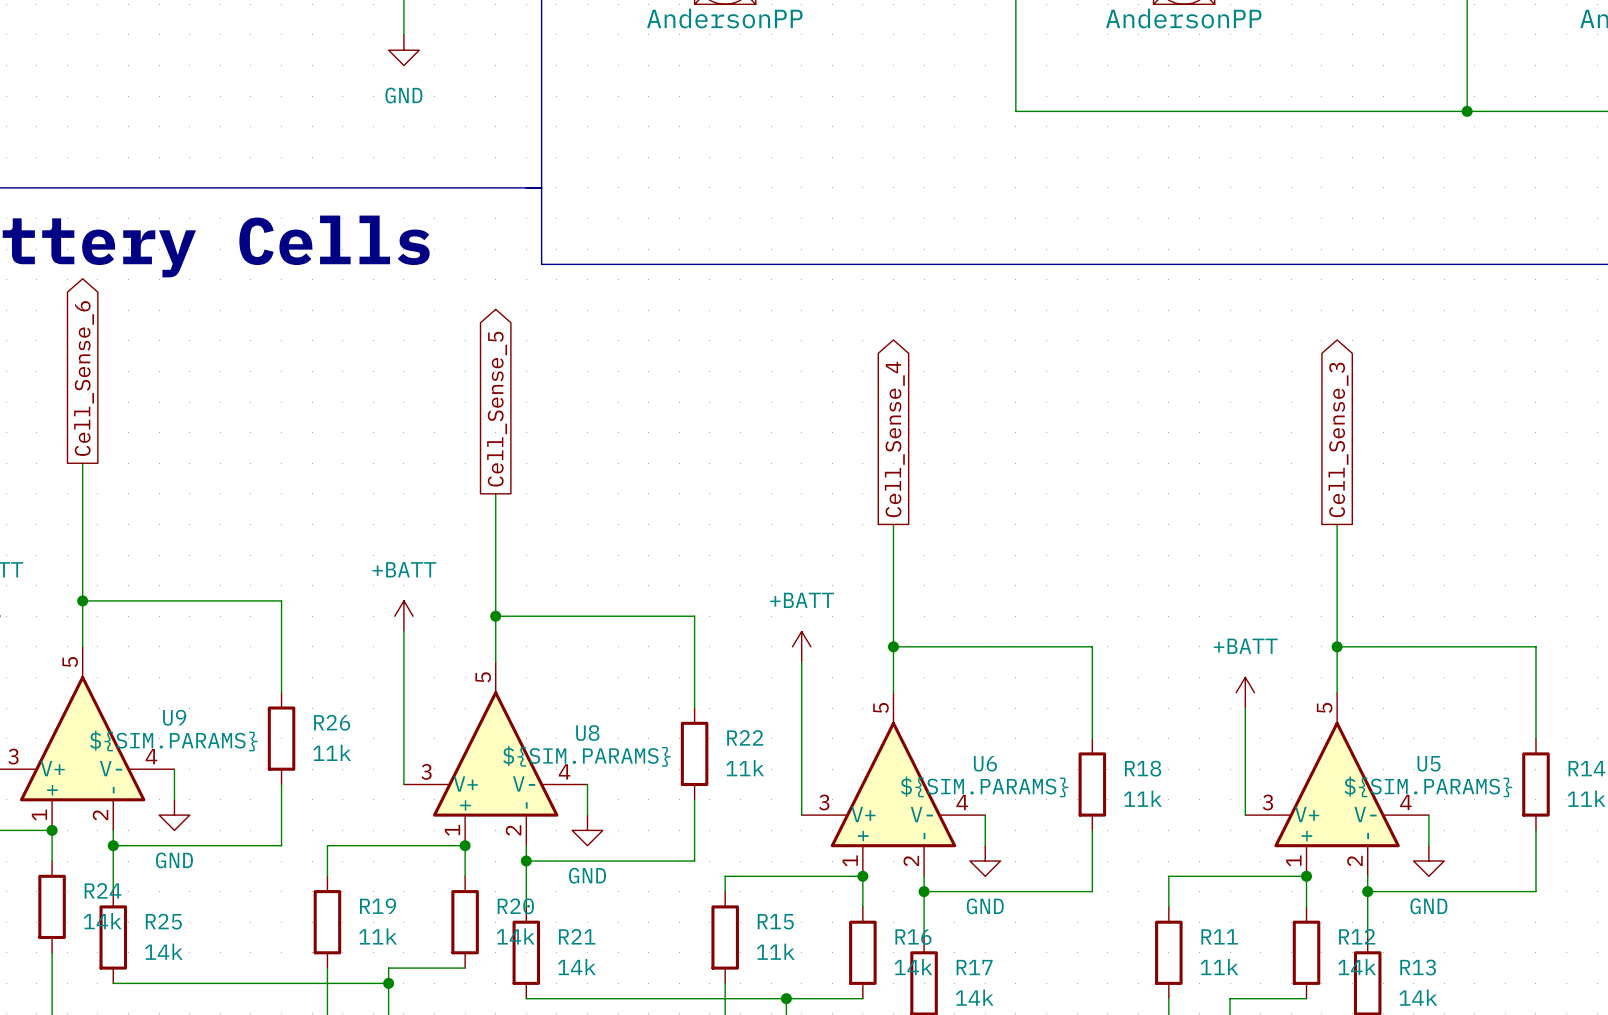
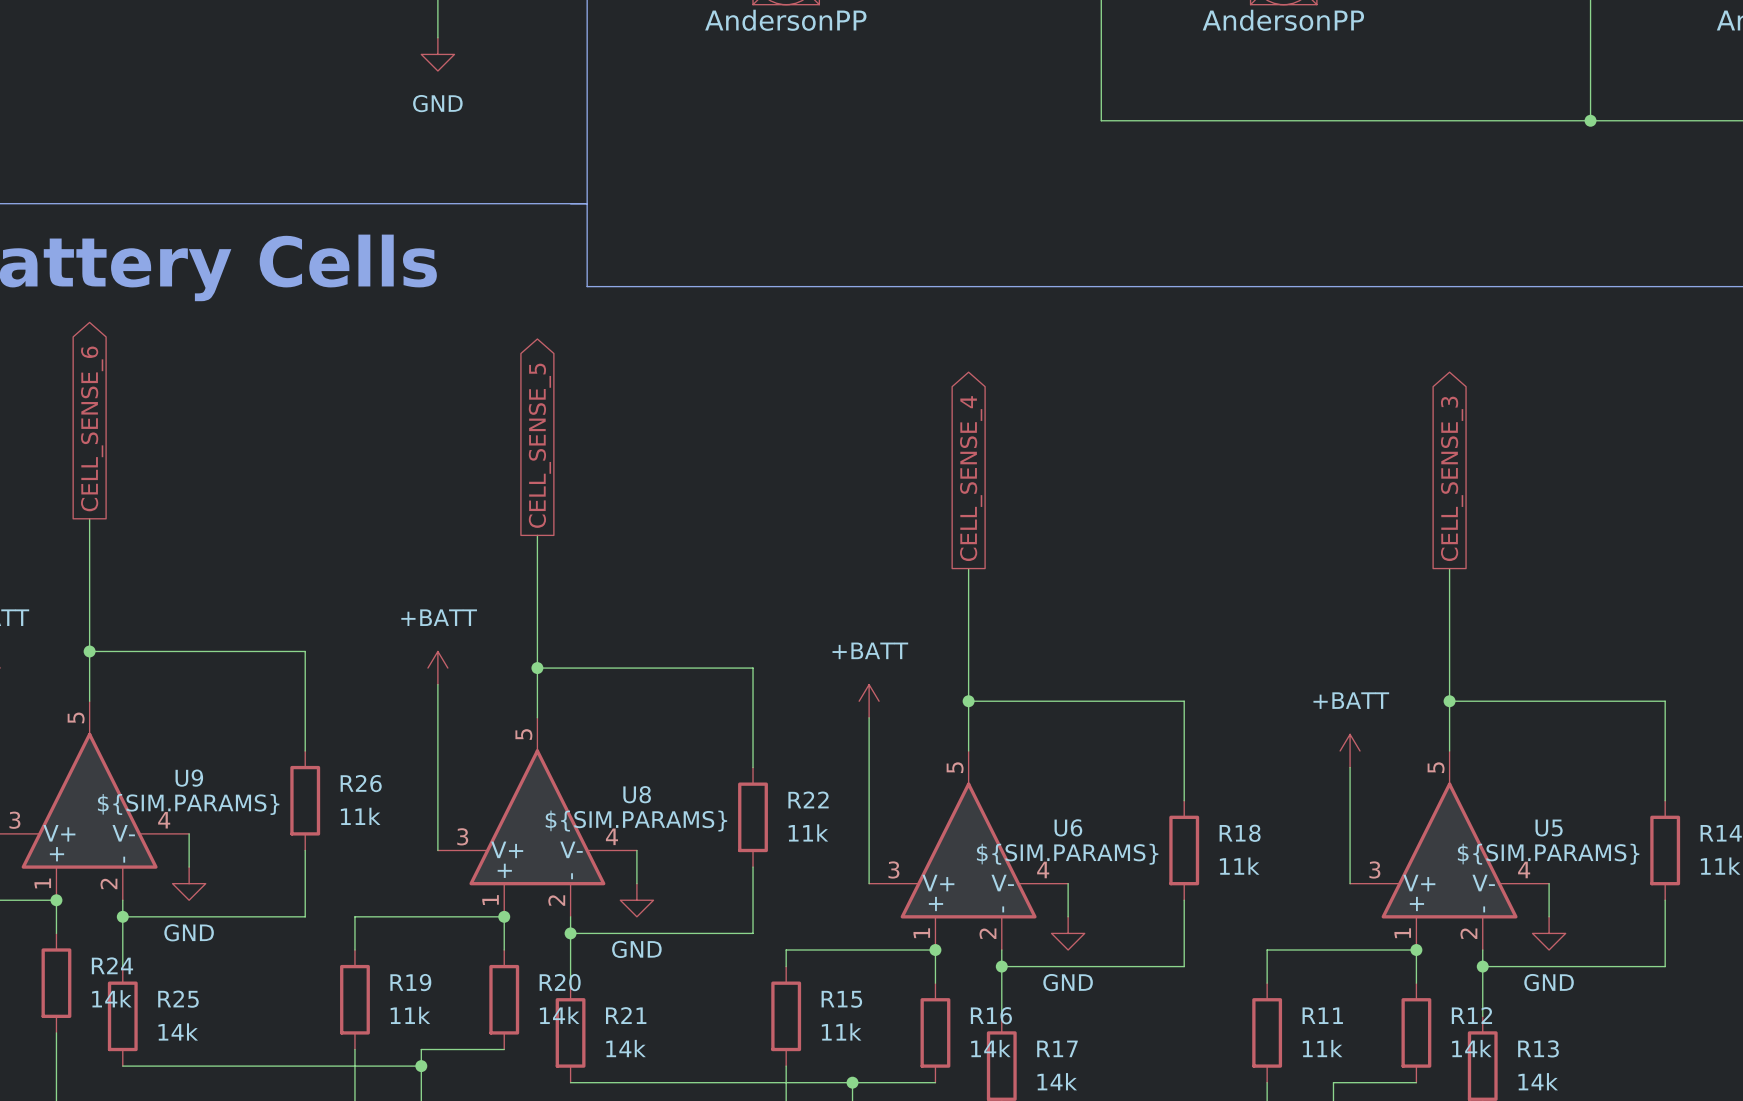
global label: Cell_Sense_6 (84, 378) -> none
global label: none -> CELL_SENSE_6 (92, 428)
global label: Cell_Sense_5 (497, 409) -> CELL_SENSE_5 (539, 445)
global label: Cell_Sense_4 (894, 439) -> CELL_SENSE_4 (971, 478)
global label: Cell_Sense_3 (1338, 439) -> CELL_SENSE_3 (1452, 478)
wire: (82, 463) (82, 478) -> none

